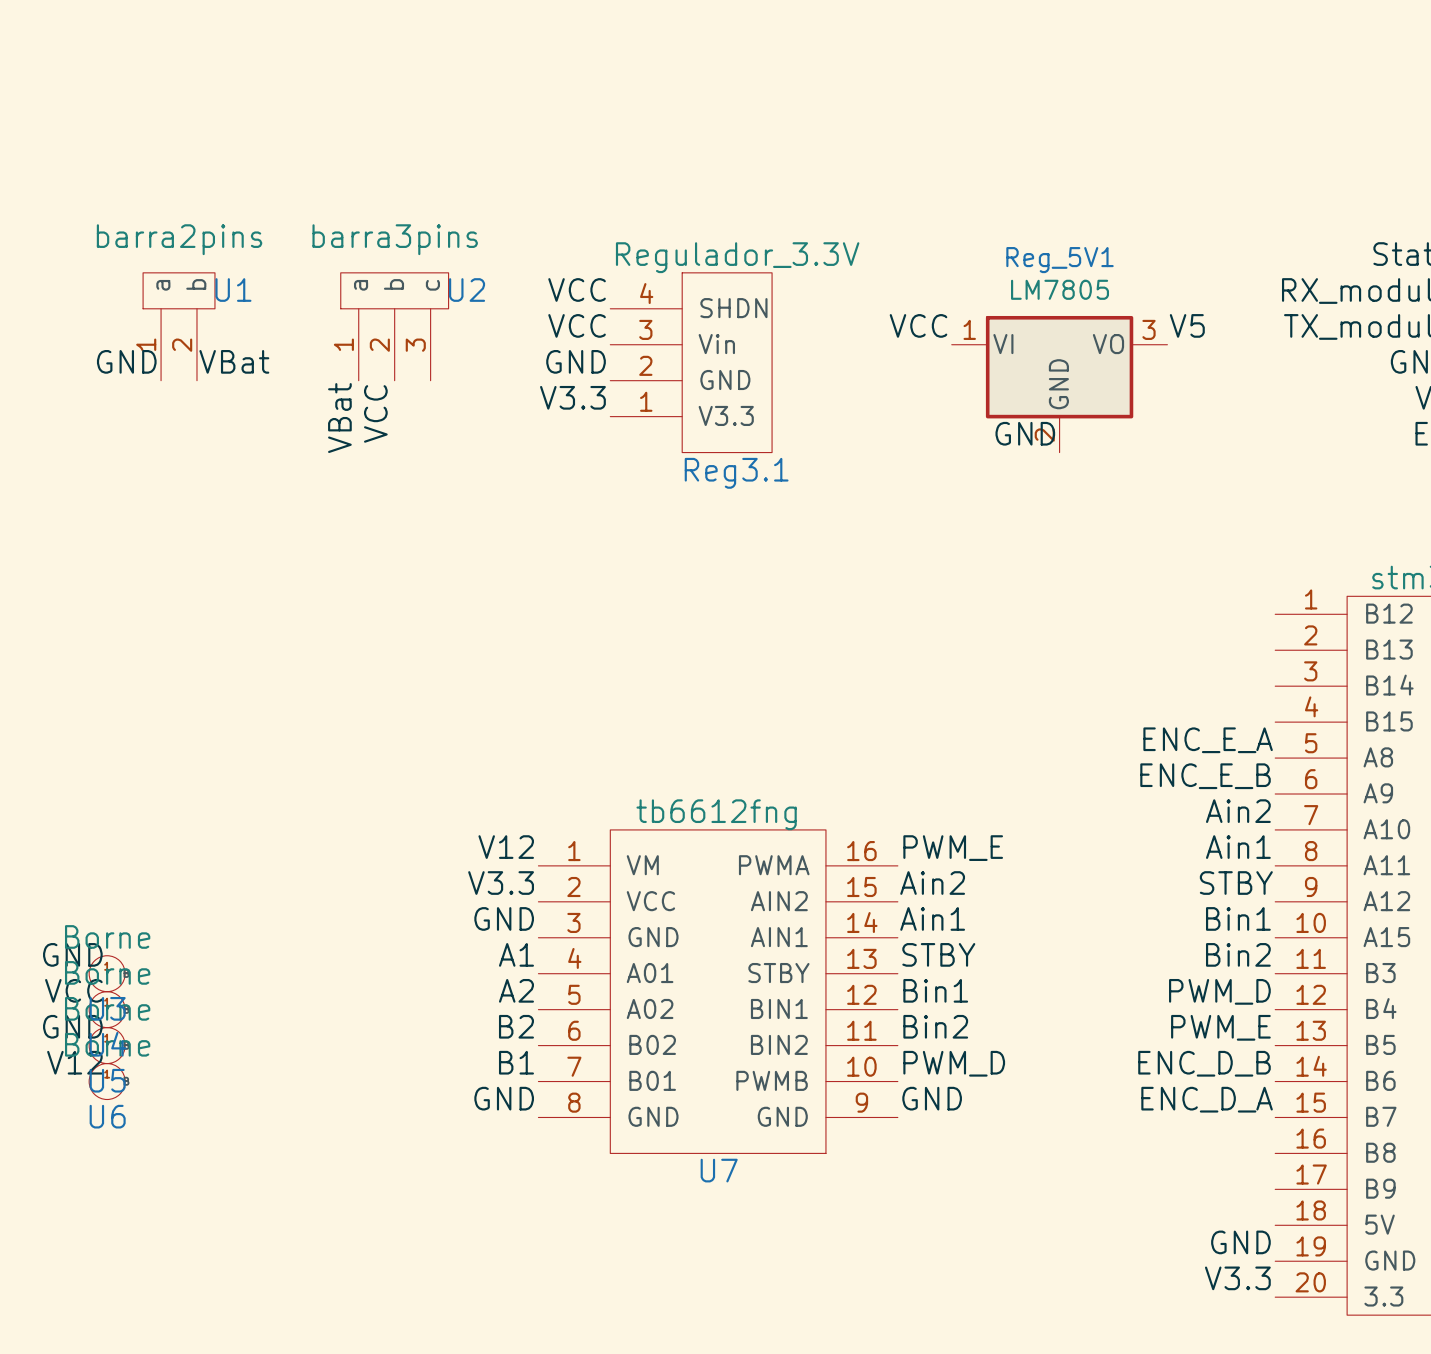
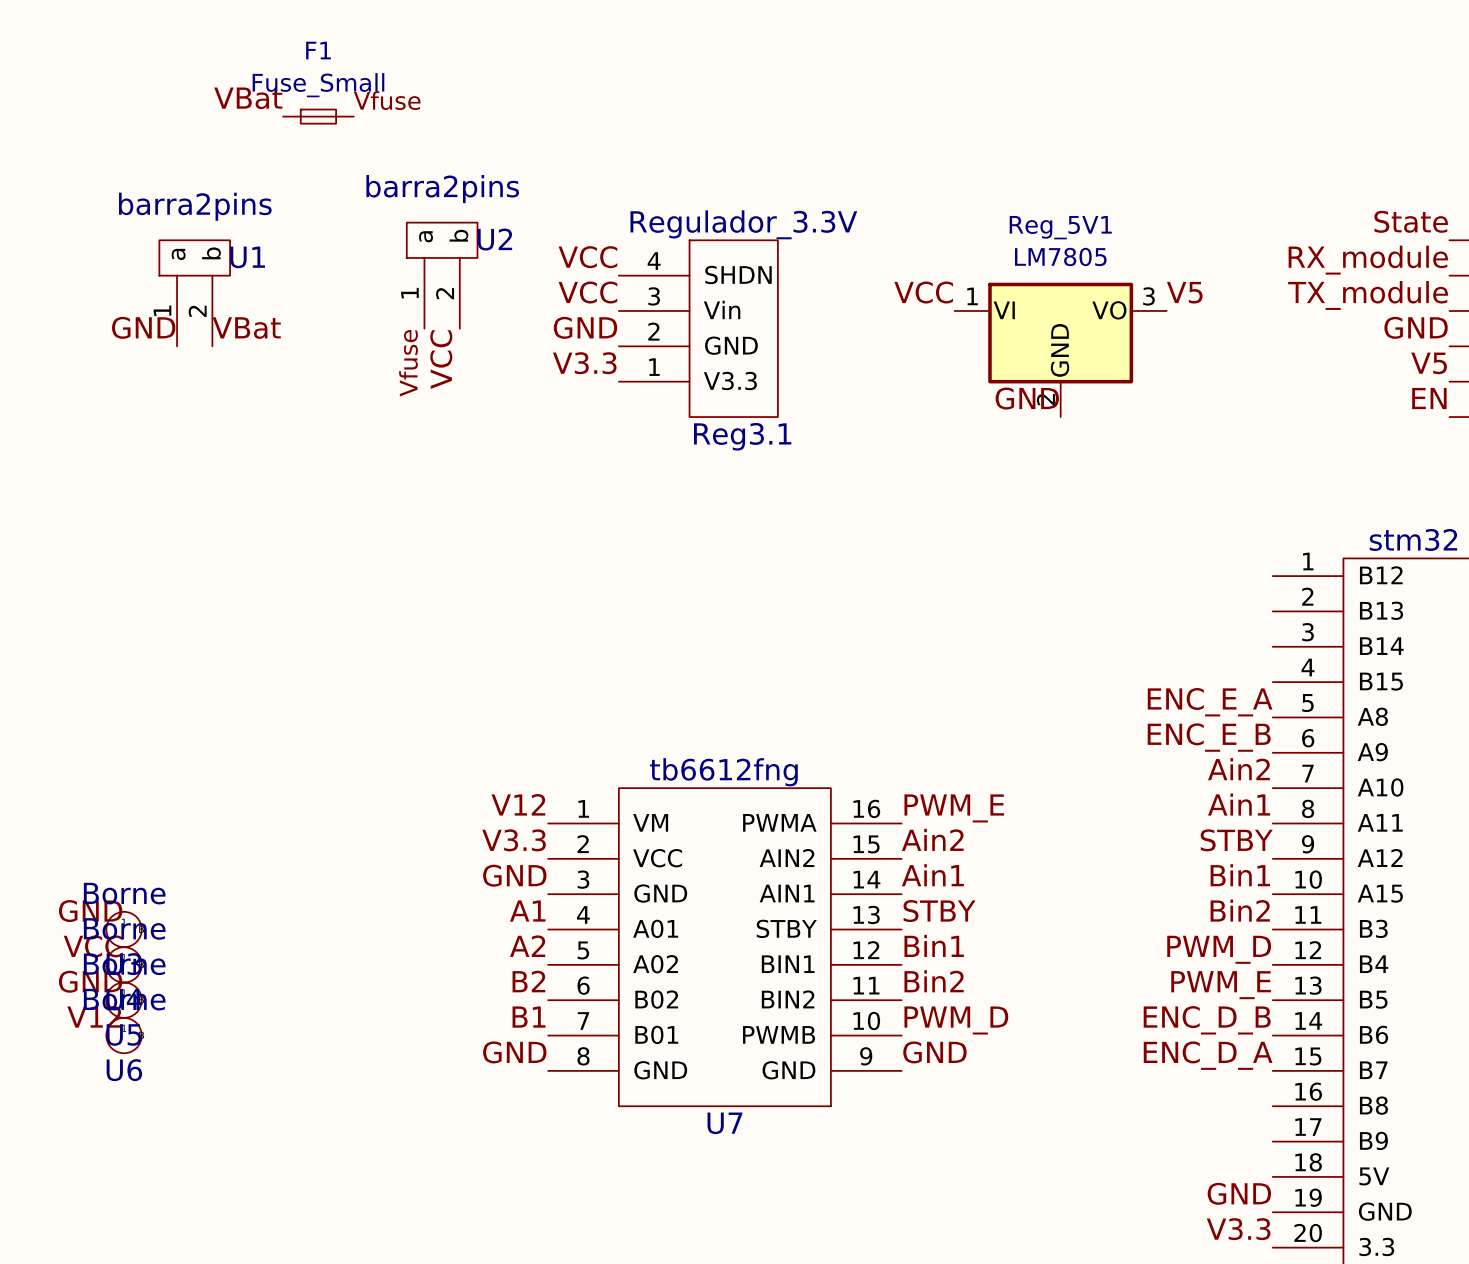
label: none -> Vfuse (387, 100)
F1: none -> Fuse_Small (318, 116)
U2 value: barra3pins (395, 239) -> barra2pins (442, 189)
U2 symbol: [340, 272, 449, 381] -> [406, 222, 478, 329]
label: none -> Vfuse (408, 363)
label position: VCC (375, 413) -> VCC (441, 359)
label rotation: 0° (339, 418) -> 90° clockwise (248, 98)
label position: VBat (339, 418) -> VBat (248, 98)

